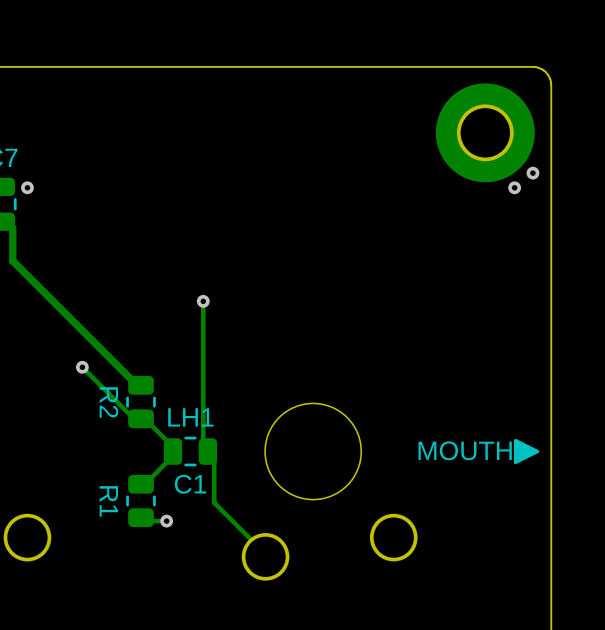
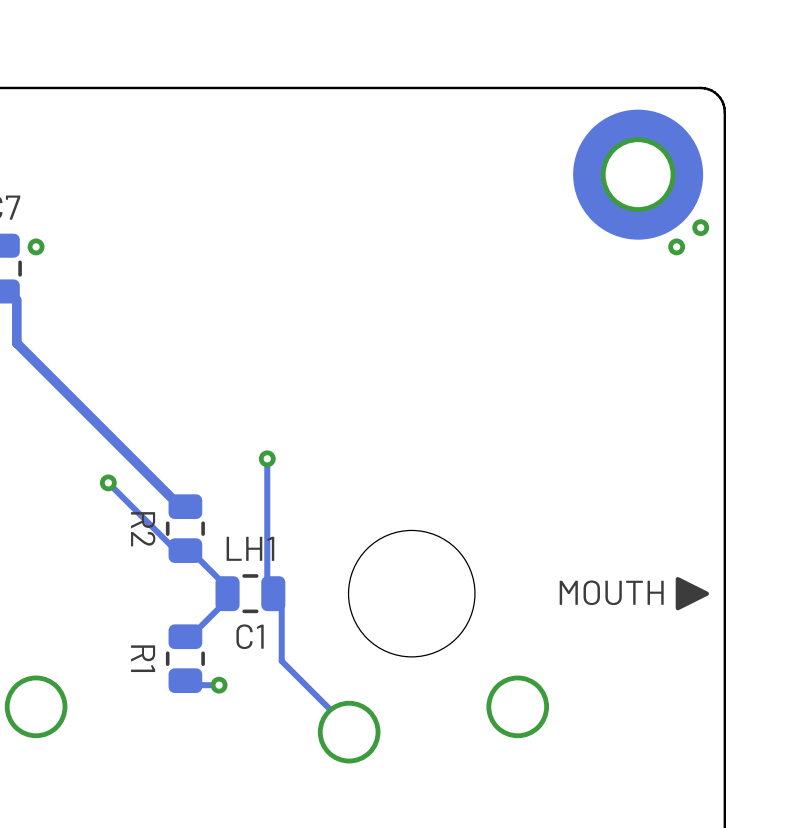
track: (203, 301) (203, 348) -> none
via position: (203, 301) -> (267, 458)

